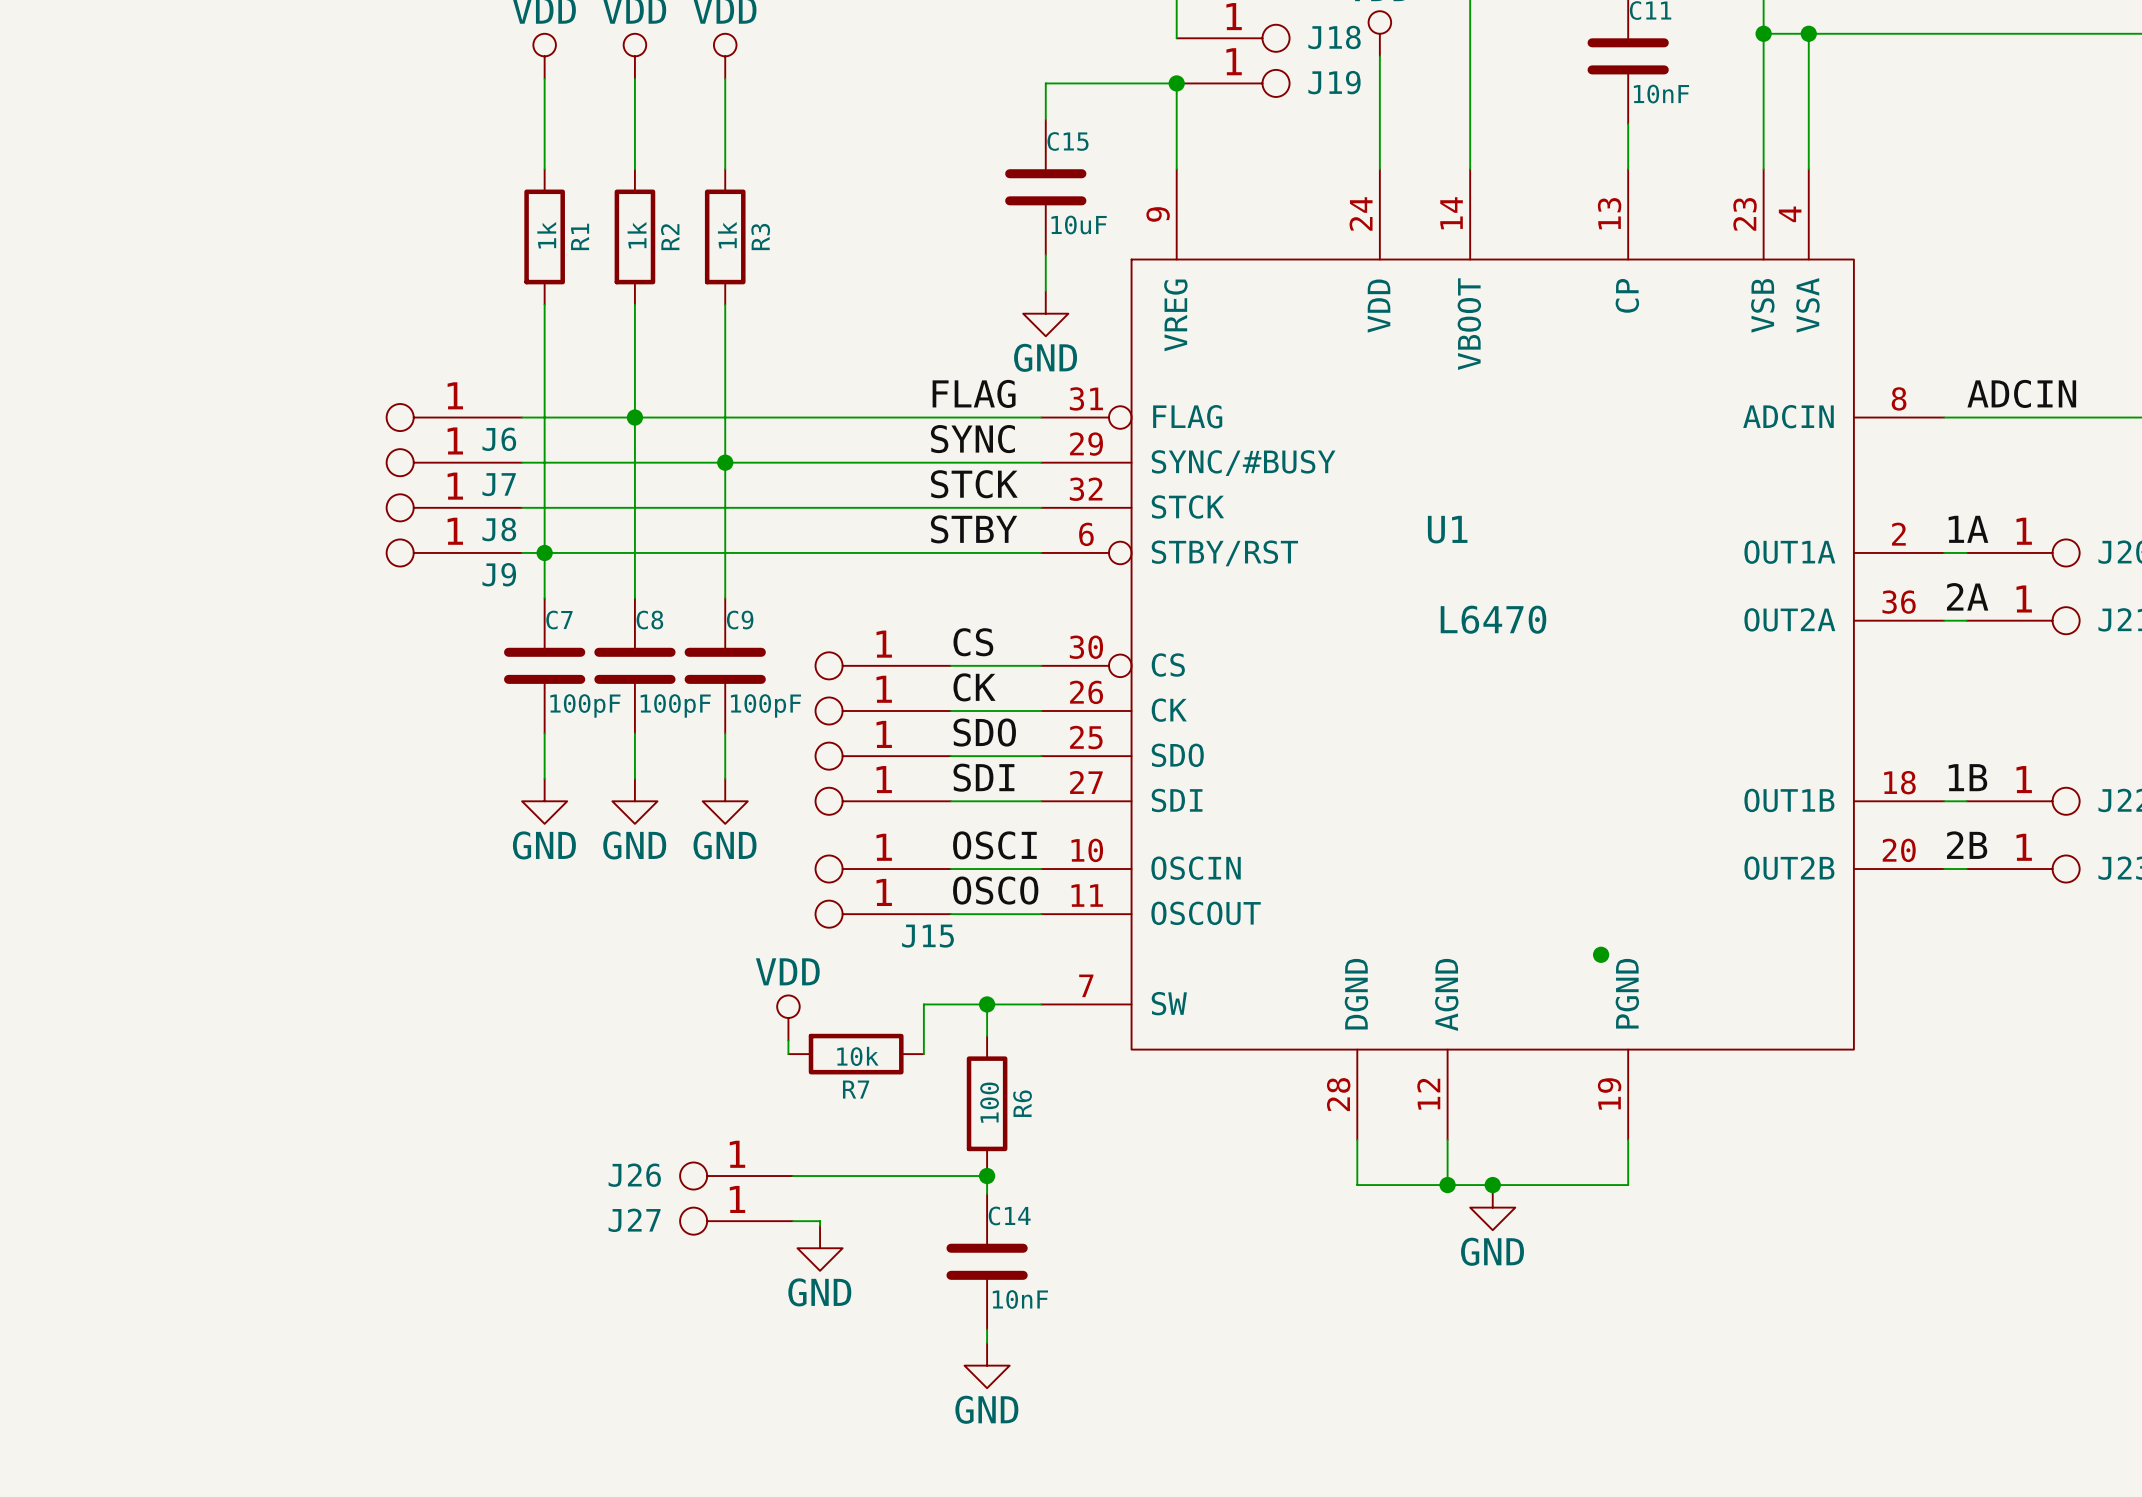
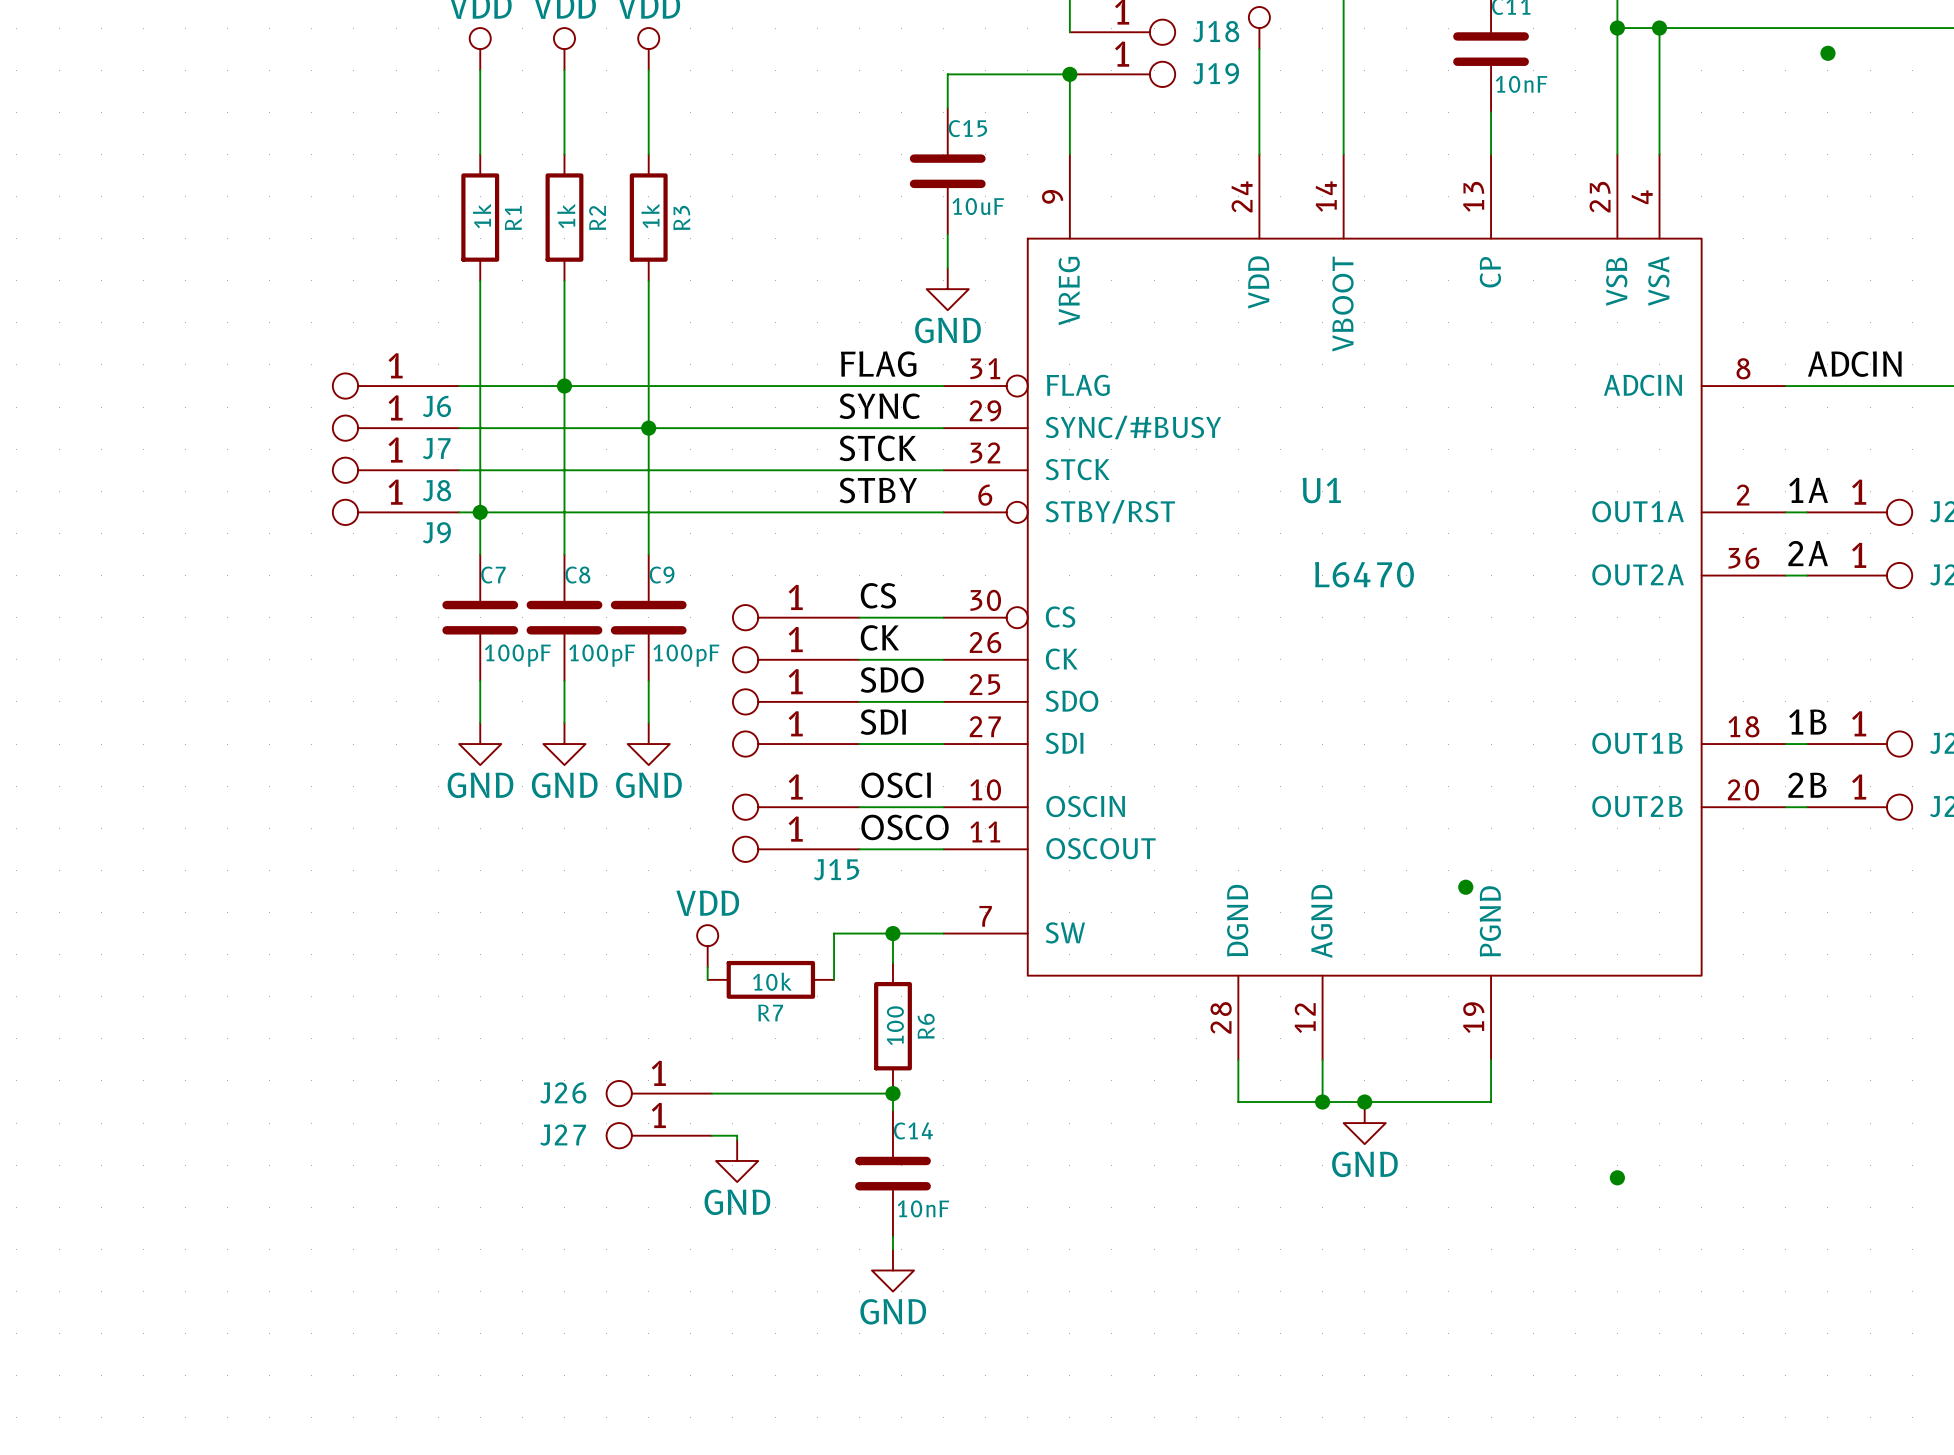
junction: none -> (1827, 53)
junction: none -> (1617, 1177)

